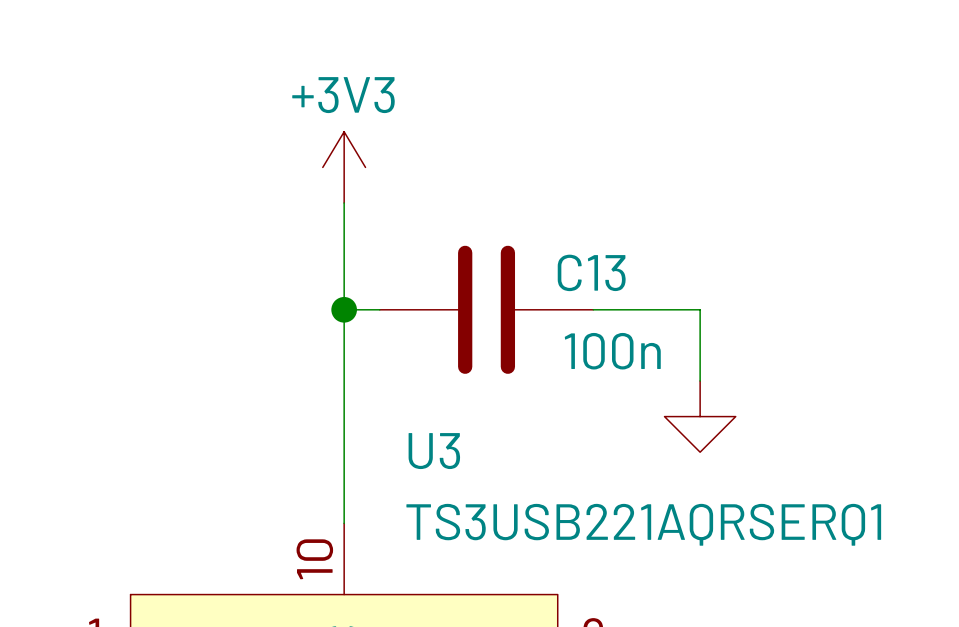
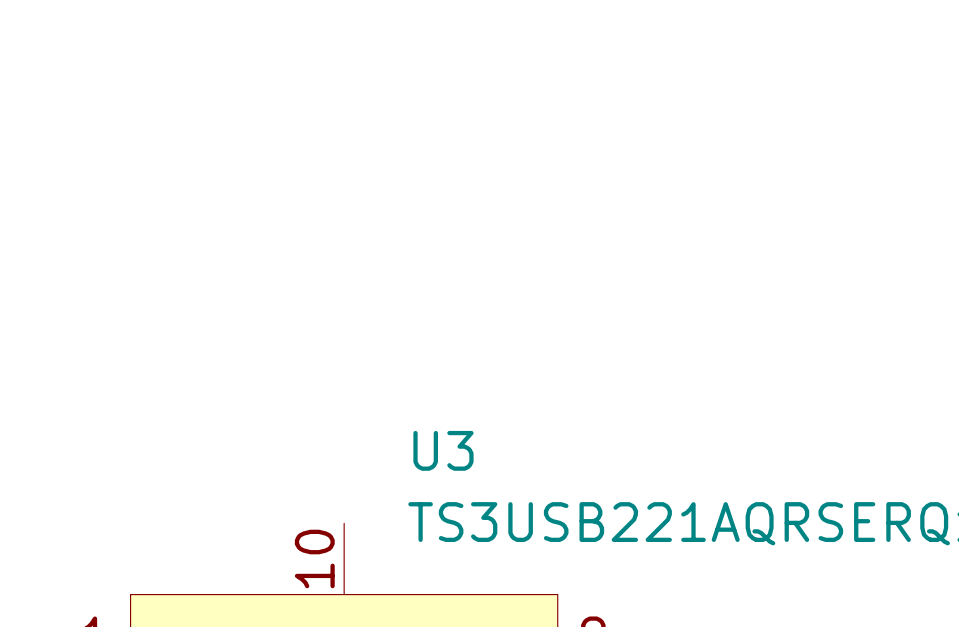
power symbol: +3V3 (344, 167) -> none
wire: (344, 203) (344, 523) -> none
wire: (344, 309) (379, 309) -> none
junction: (344, 309) -> none
C13: 100n (486, 309) -> none
wire: (593, 309) (700, 309) (700, 381) -> none
power symbol: (700, 416) -> none

